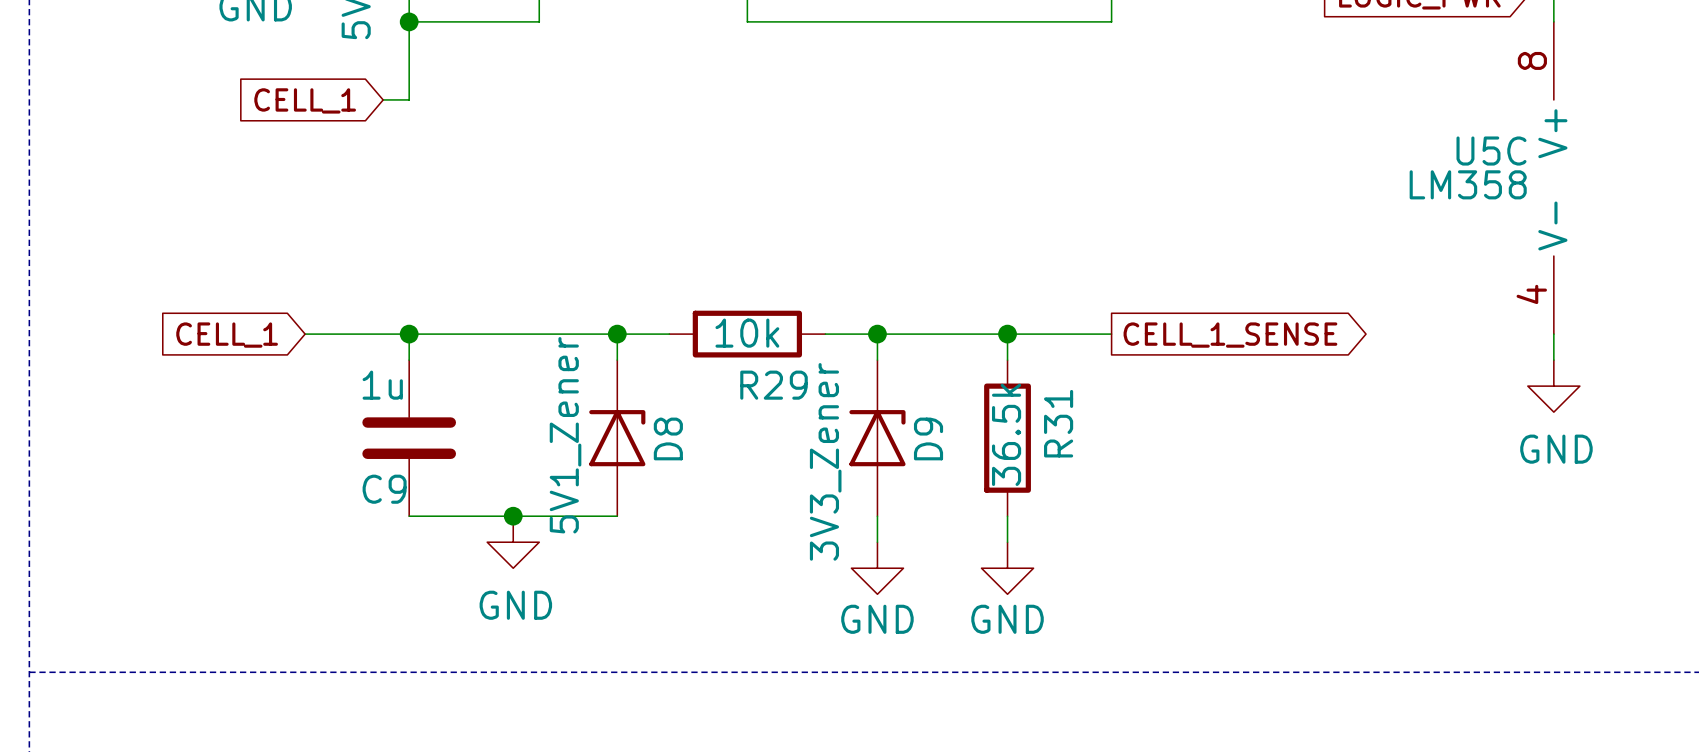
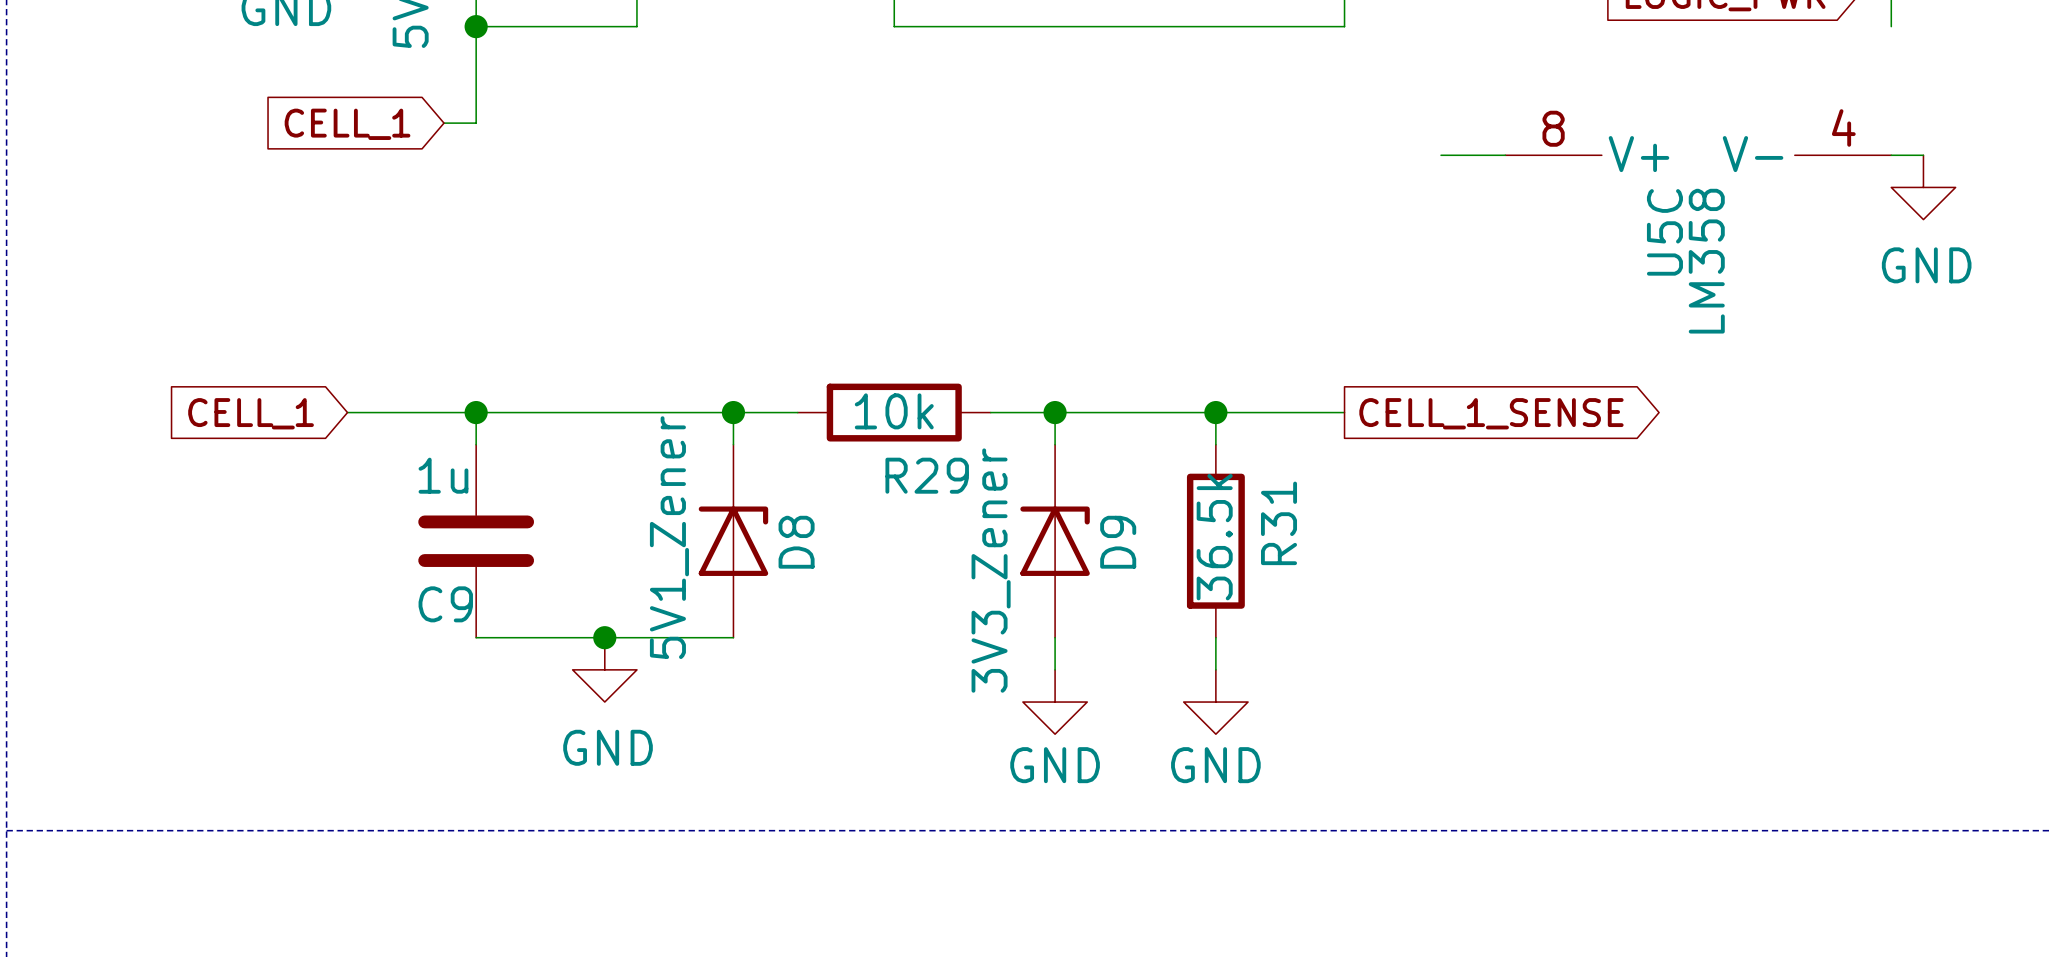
wire: none -> (1441, 155) (1505, 155)
wire: none -> (1891, 155) (1923, 155)
U5C rotation: 0° (1553, 178) -> 90° counterclockwise (1698, 155)
wire: (1553, 334) (1553, 360) -> none
power symbol position: GND (1553, 386) -> GND (1923, 187)

